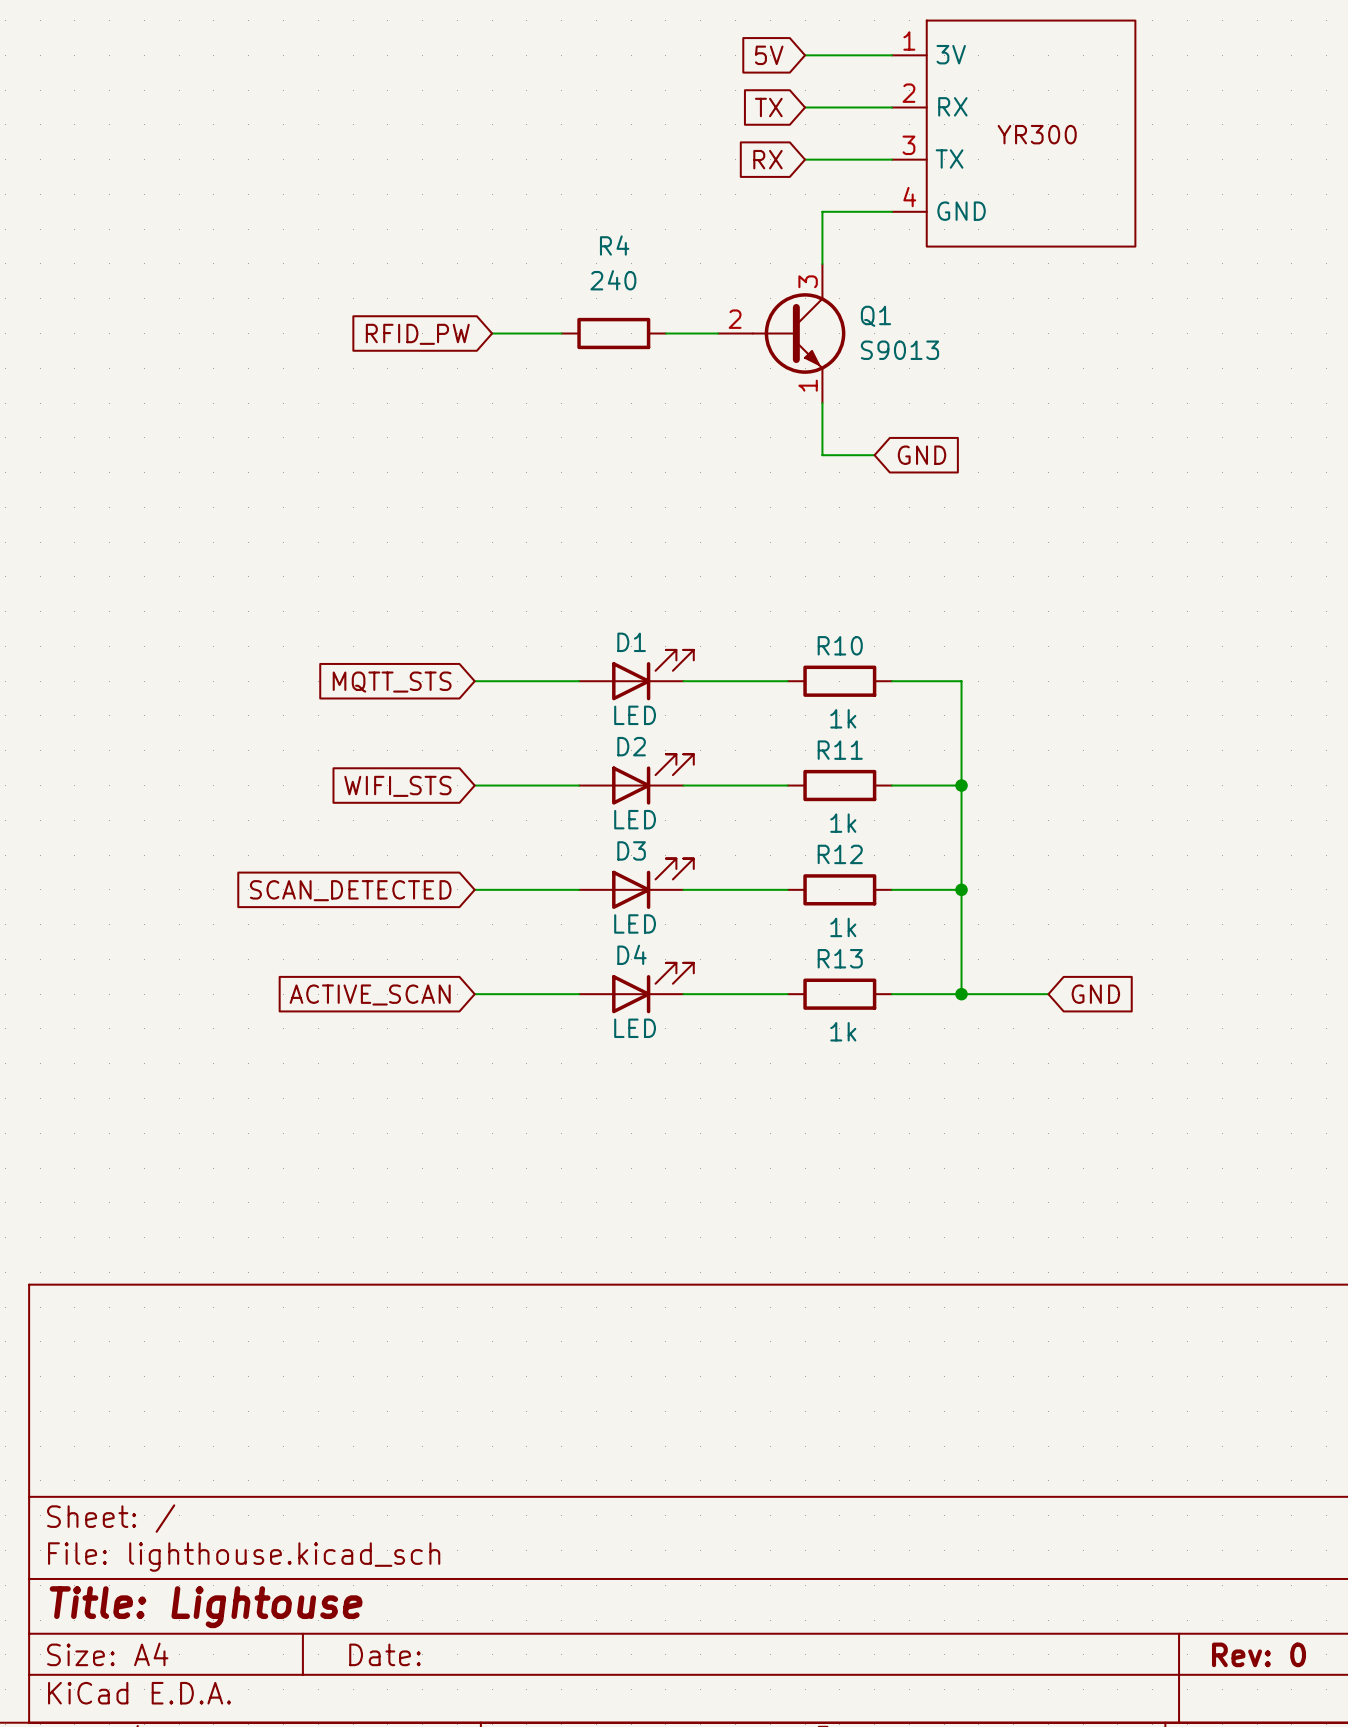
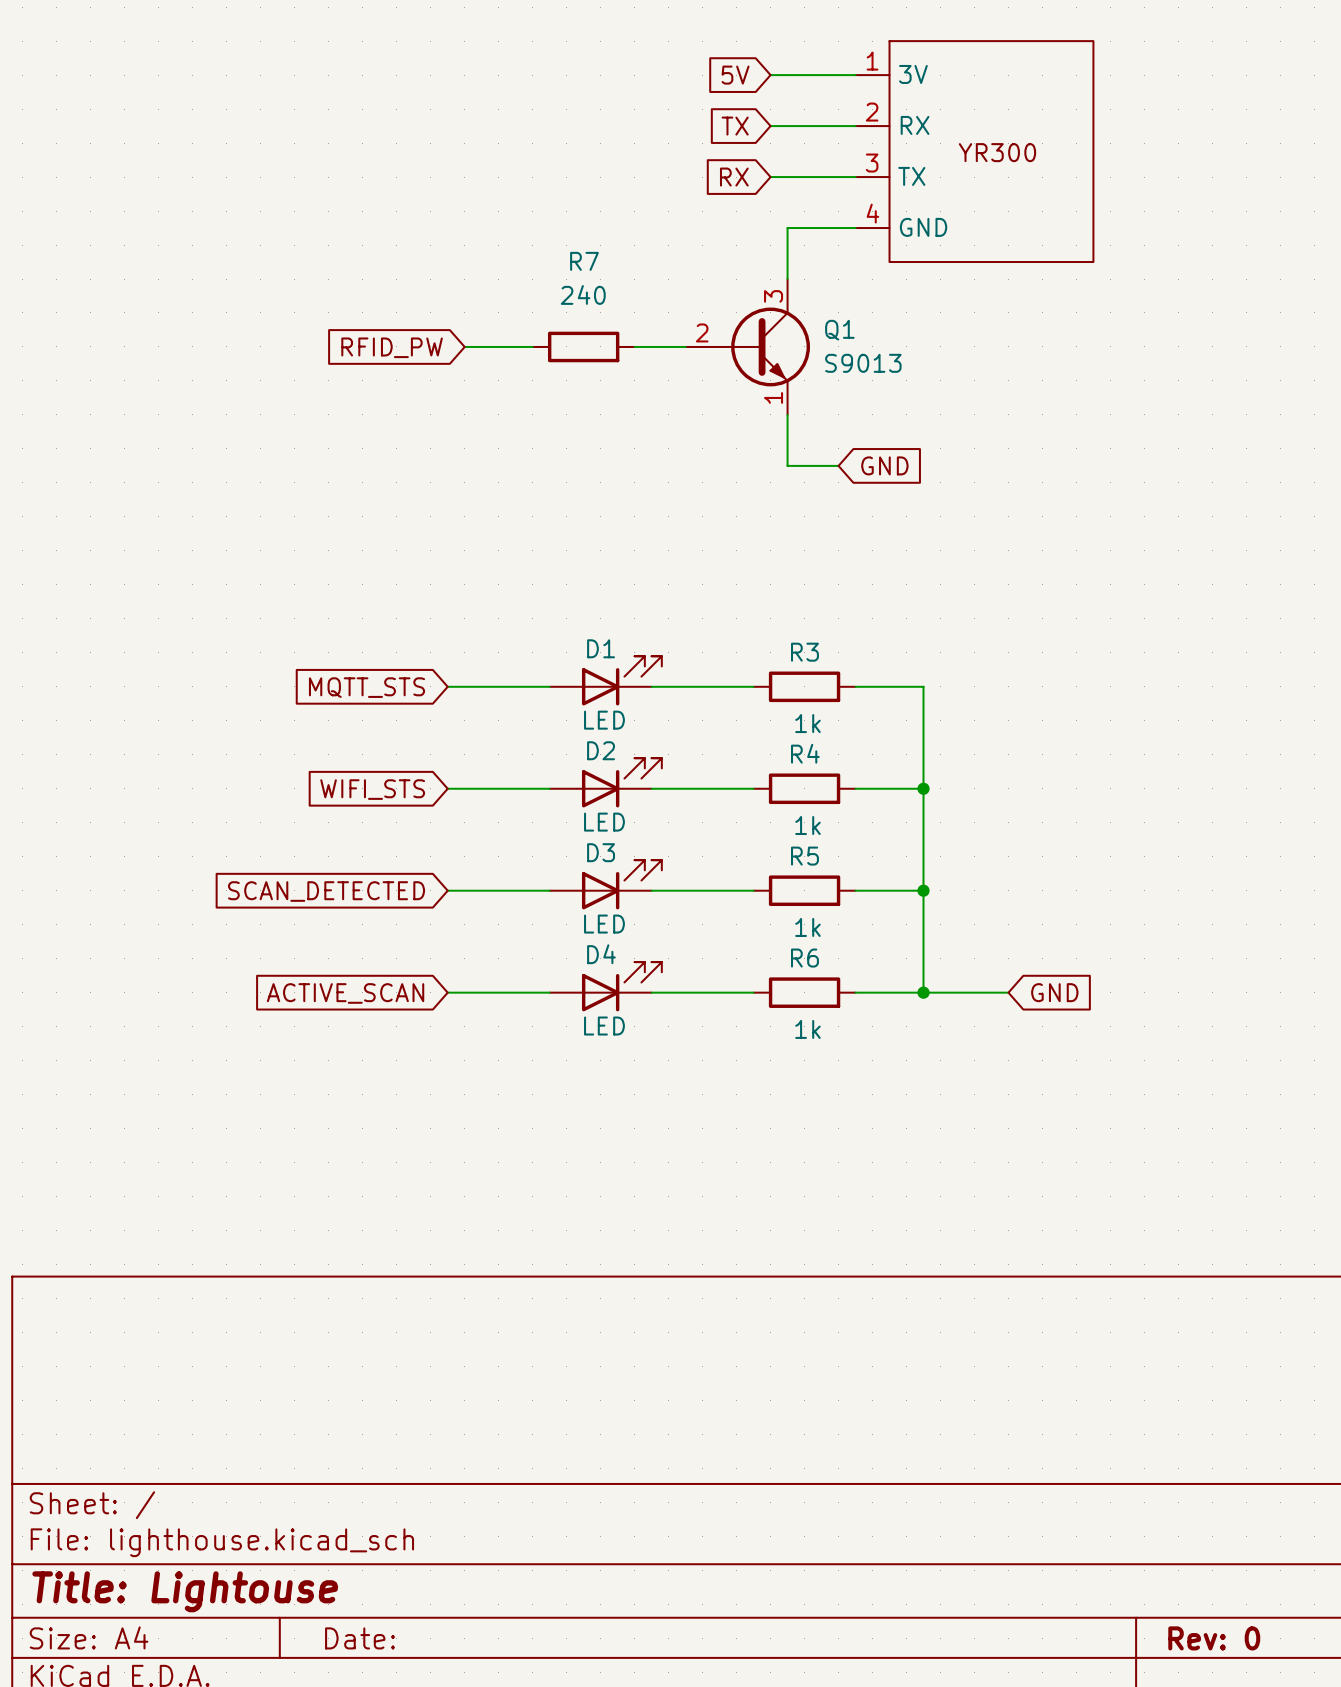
R4 name: R4 (614, 245) -> R7 (584, 261)
R10 name: R10 (840, 645) -> R3 (804, 652)
R11 name: R11 (840, 750) -> R4 (805, 753)
R12 name: R12 (840, 854) -> R5 (804, 856)
R13 name: R13 (840, 958) -> R6 (804, 958)

